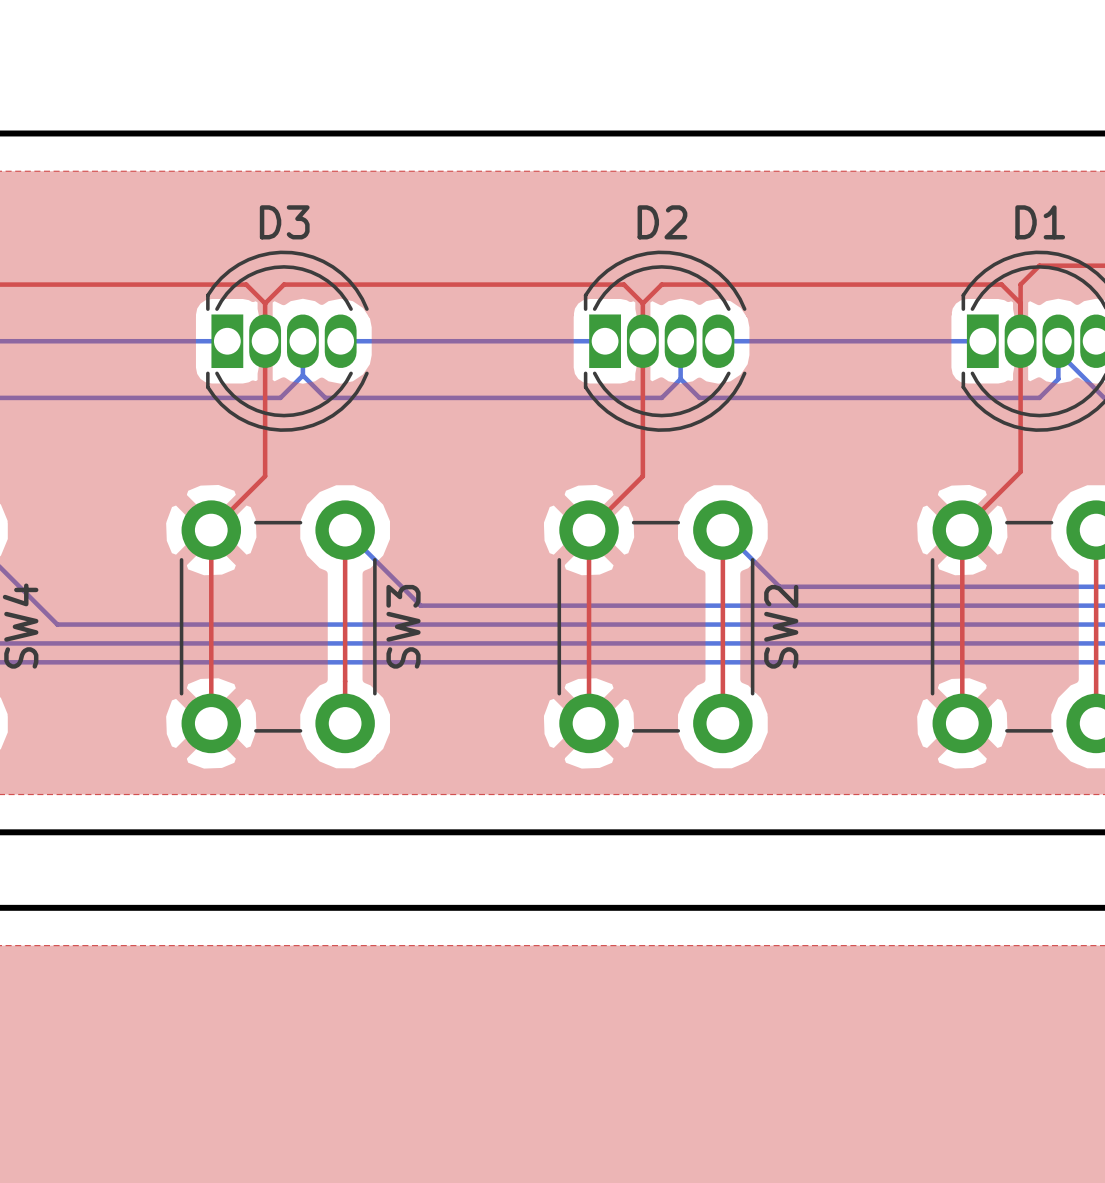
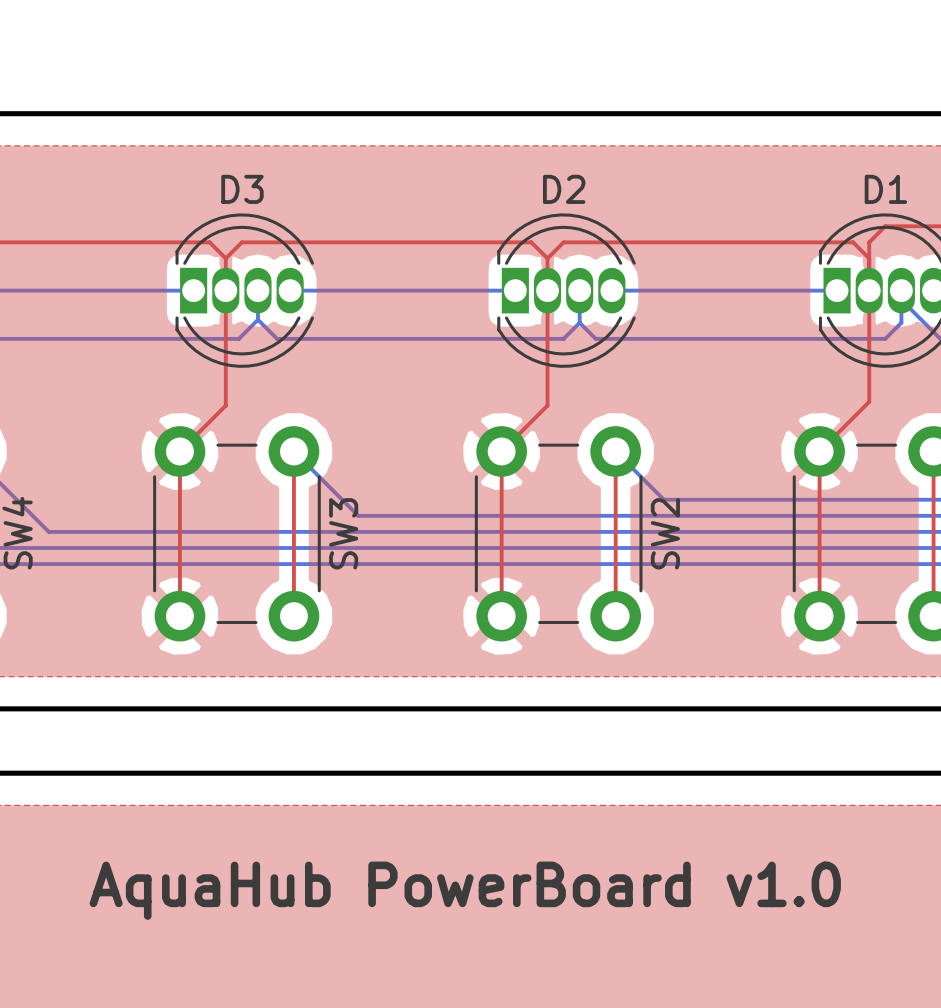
text: none -> AquaHub PowerBoard v1.0 (465, 890)

